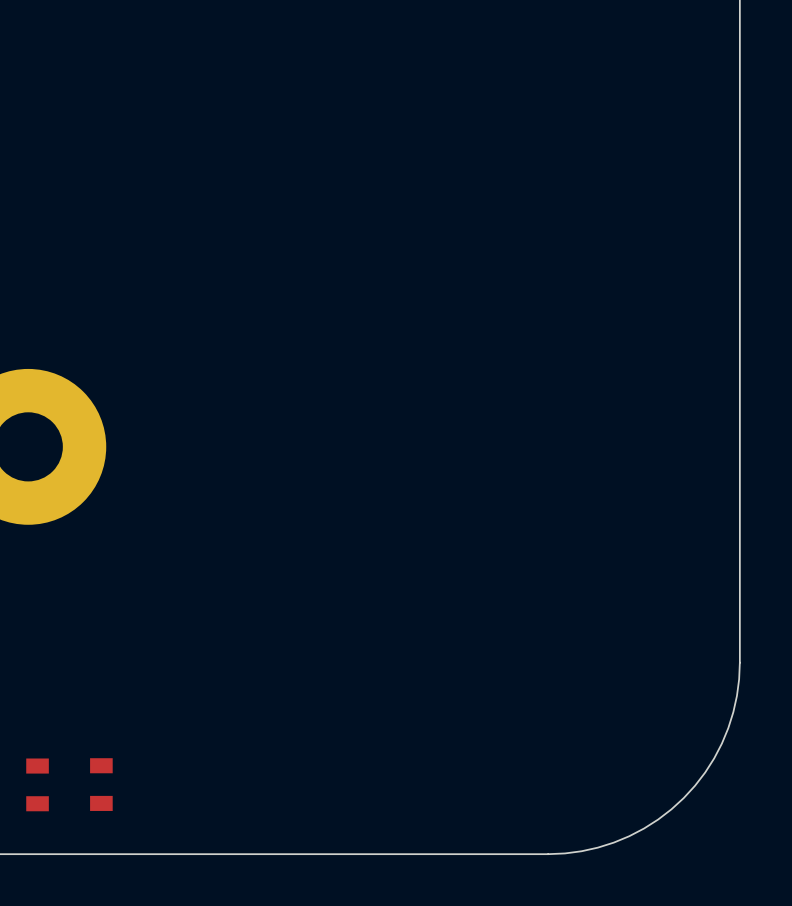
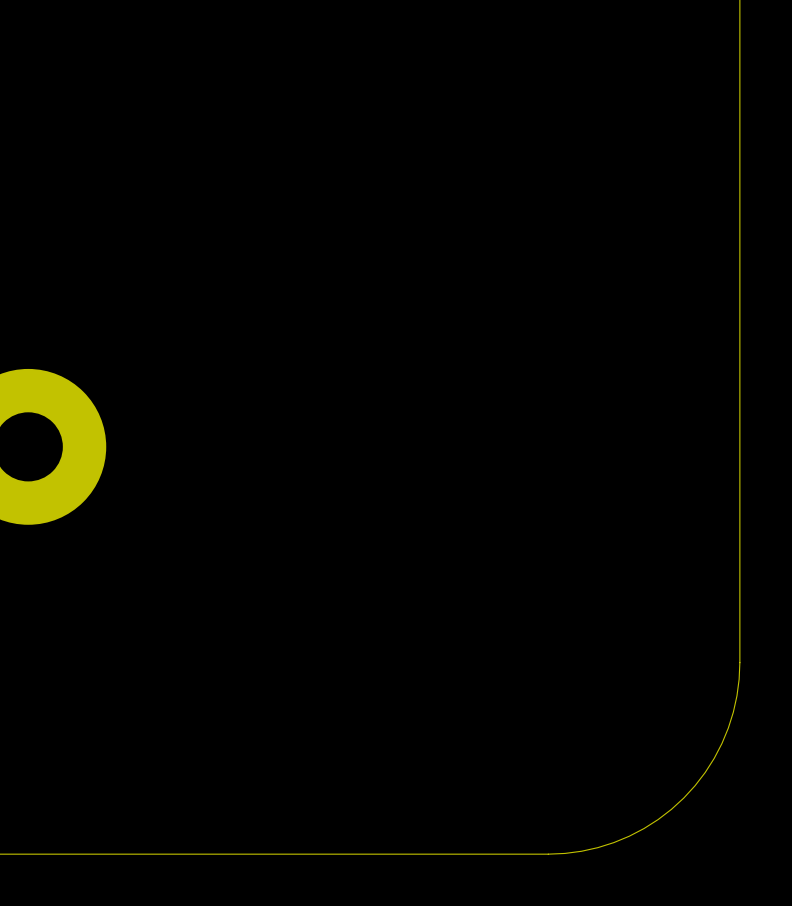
part: (37, 784) -> none
part: (101, 784) -> none

